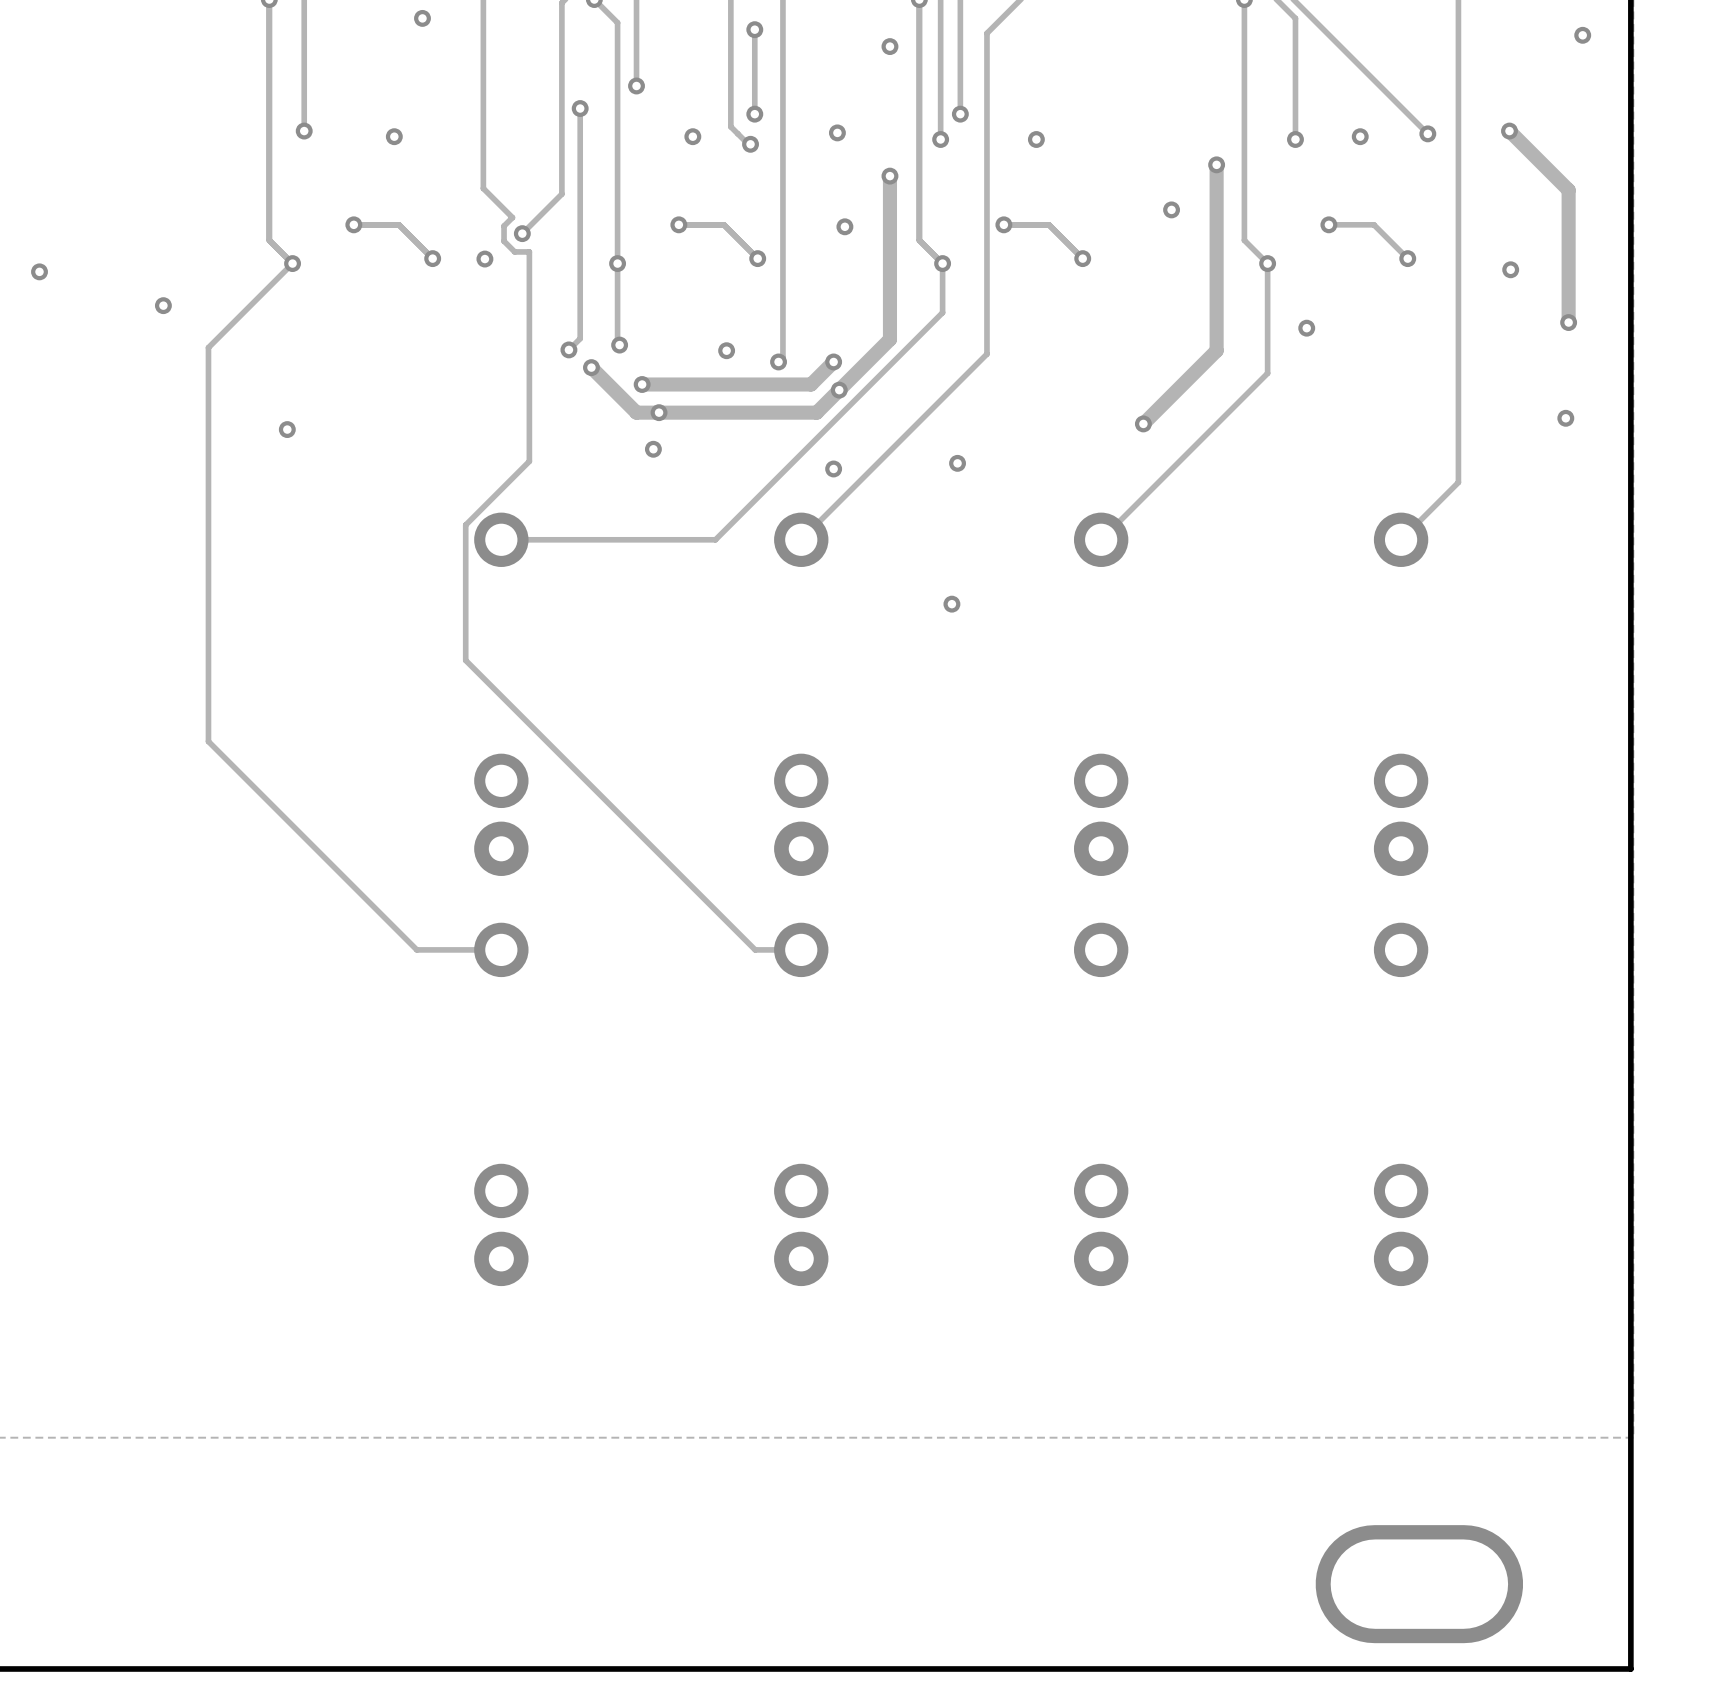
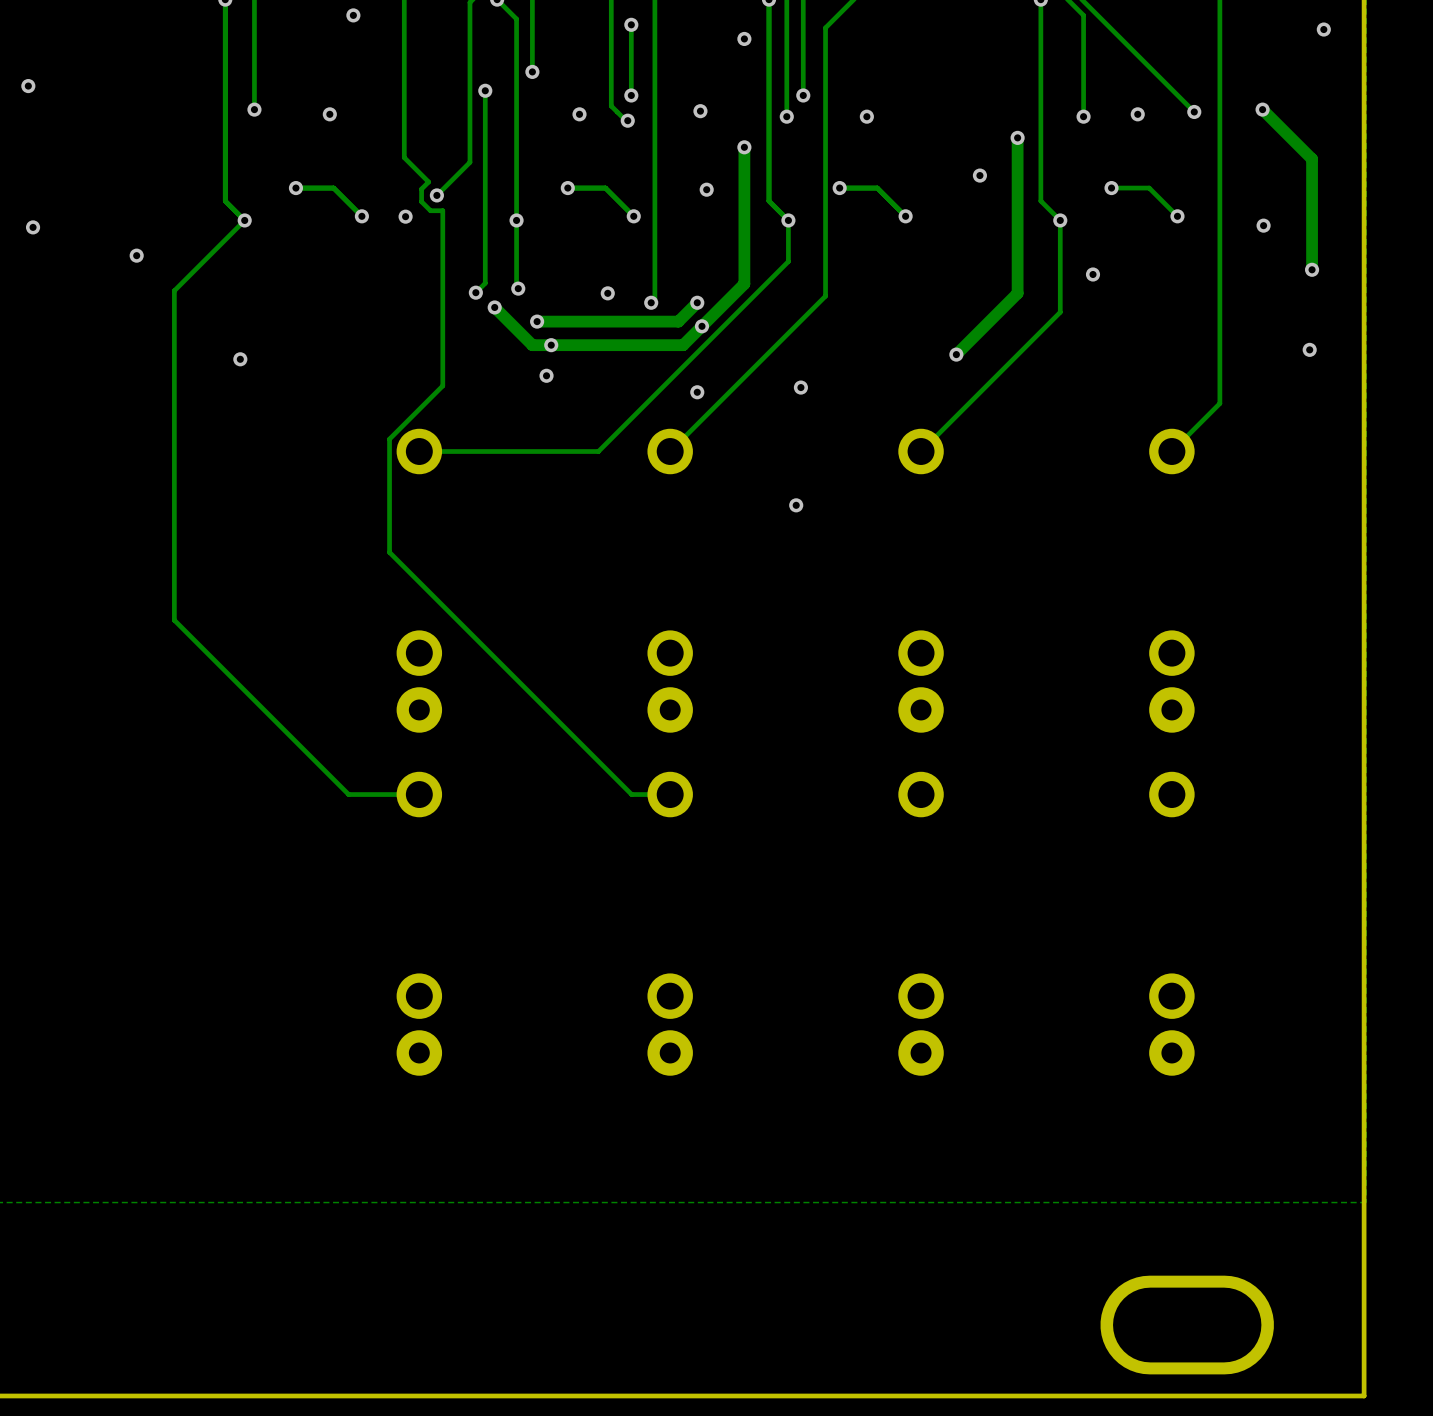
via: none -> (28, 86)

